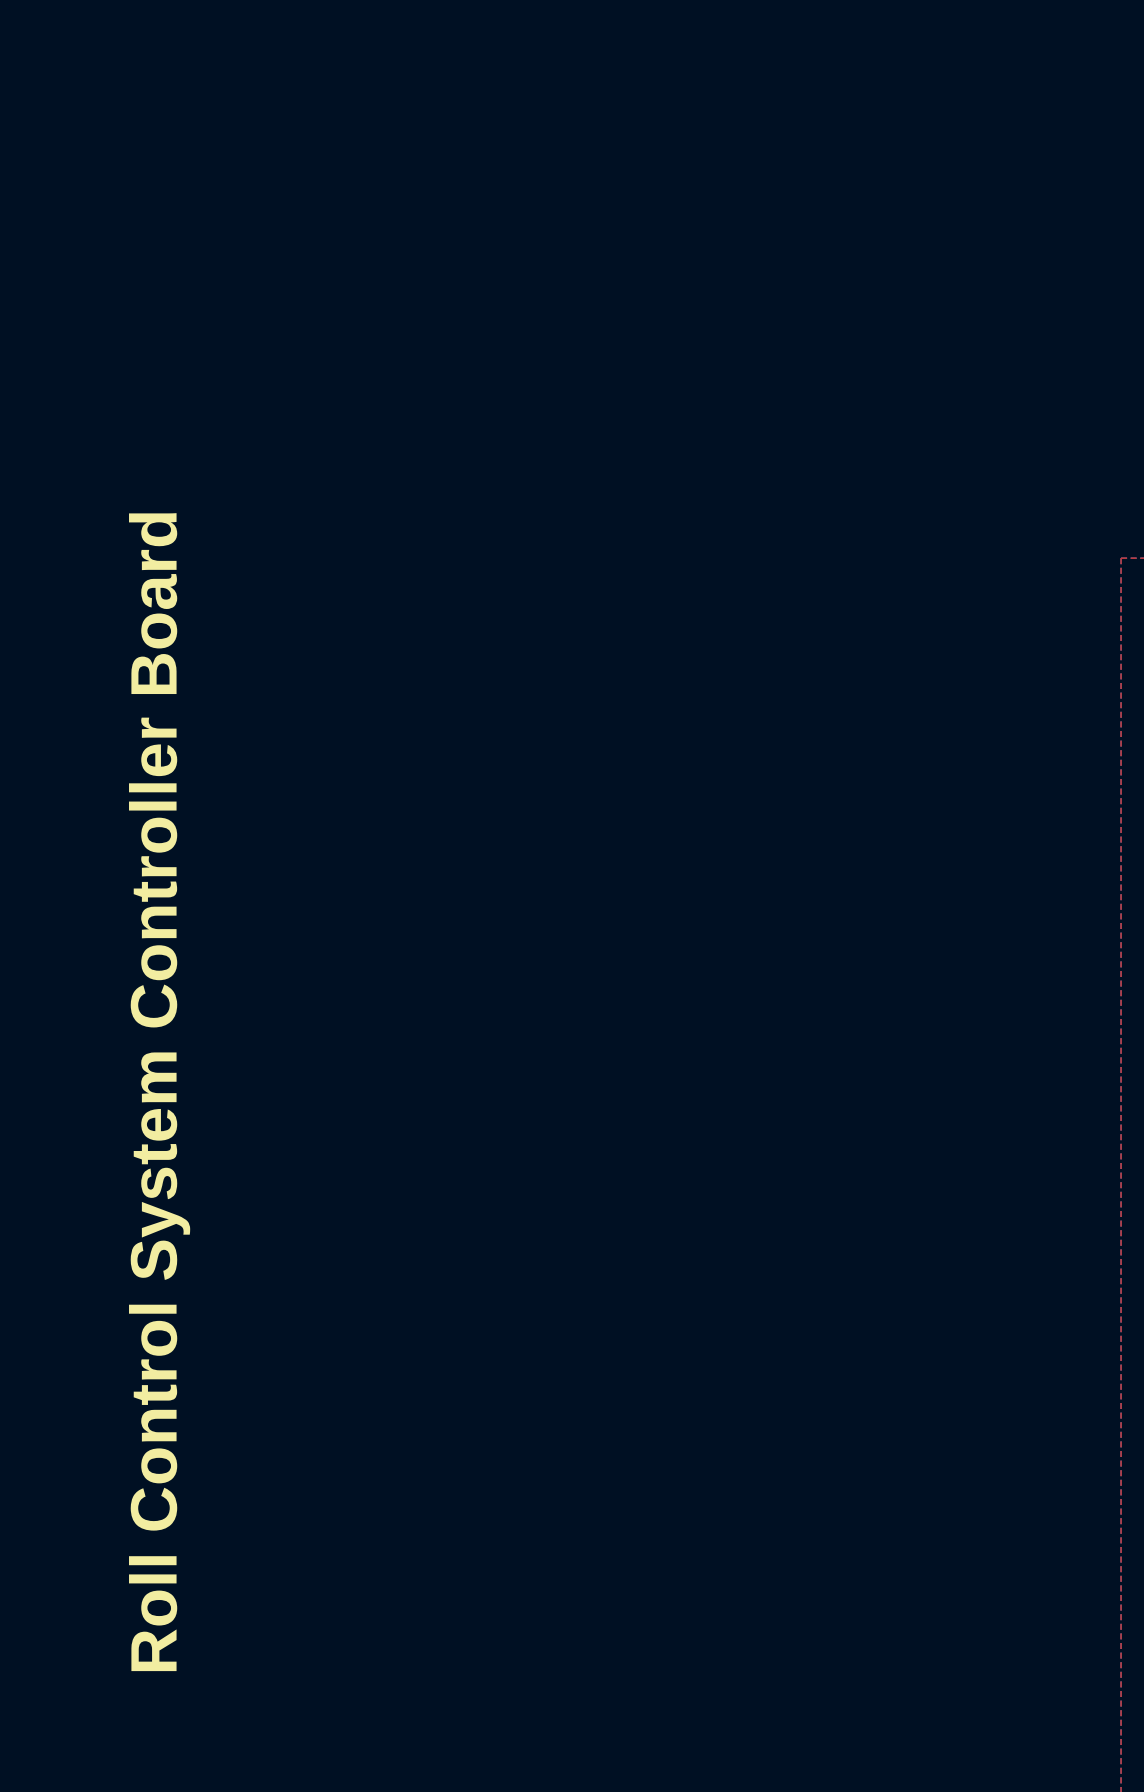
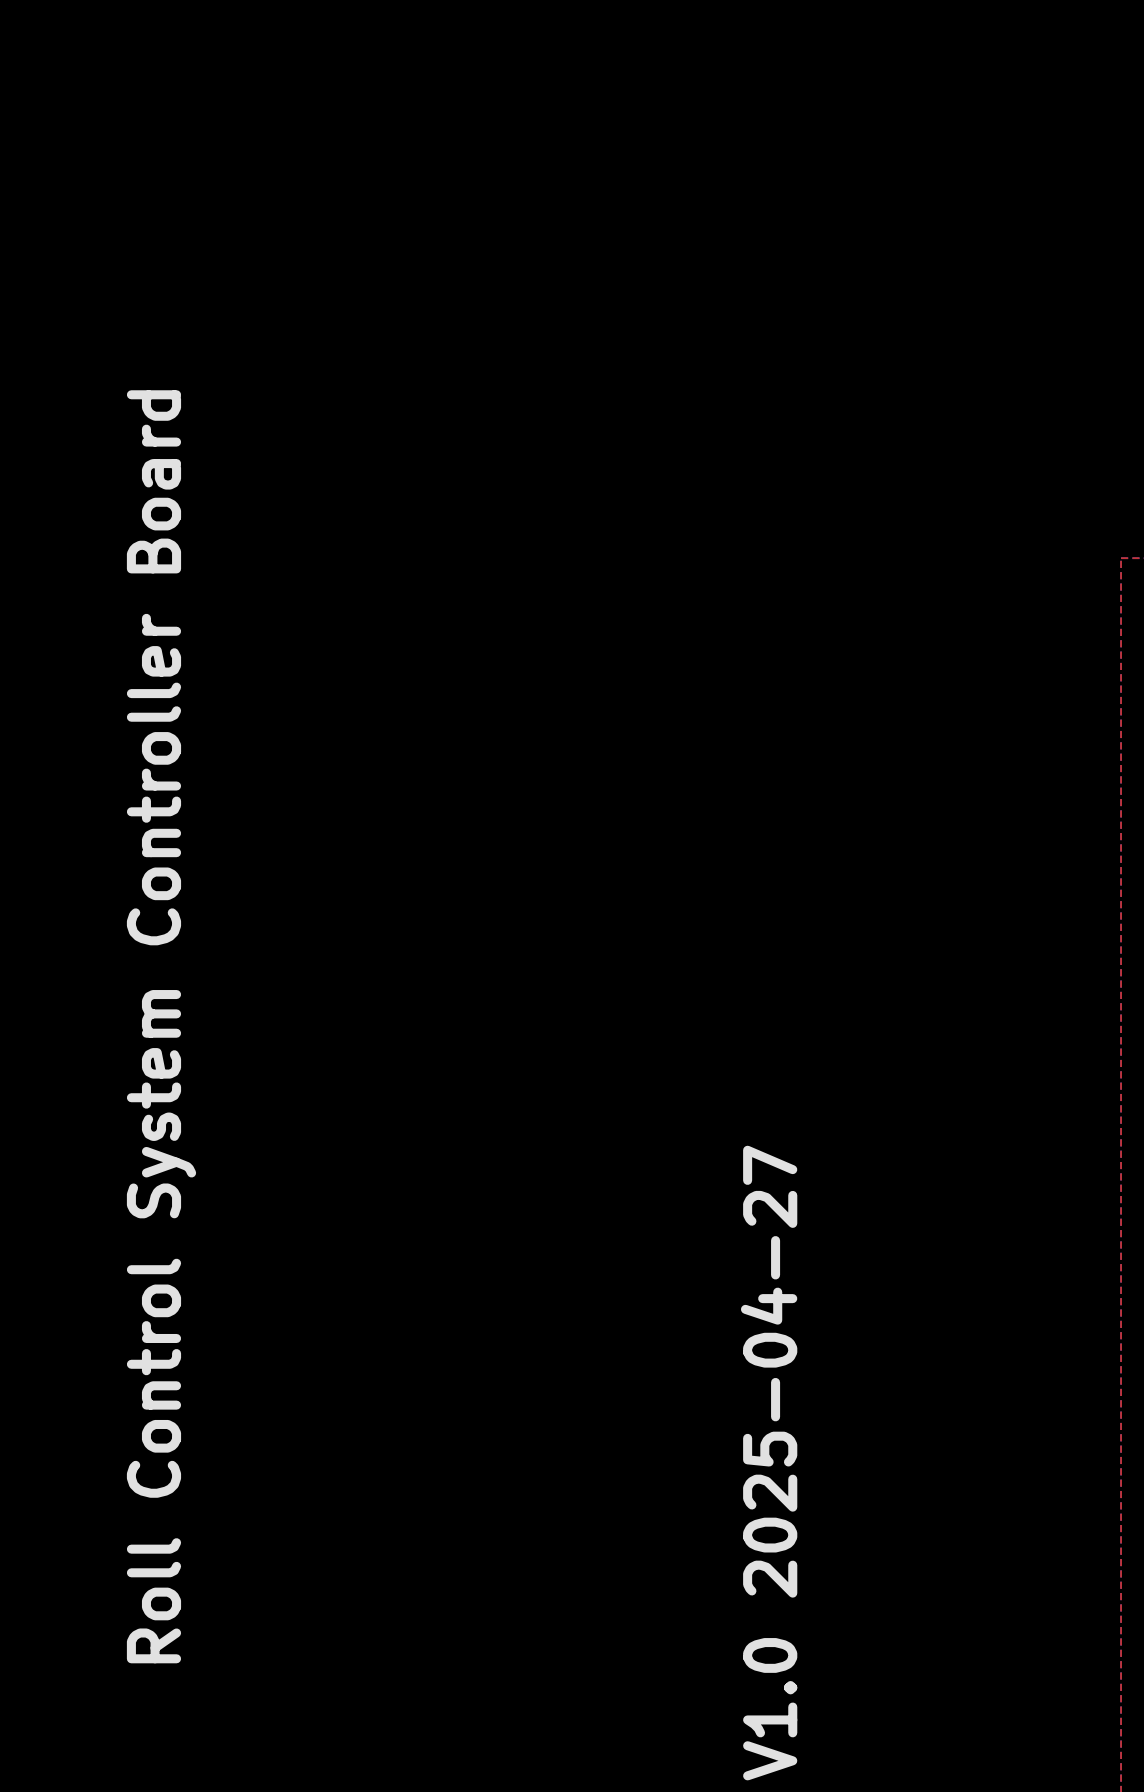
text: none -> V1.0 2025-04-27 (769, 1463)

